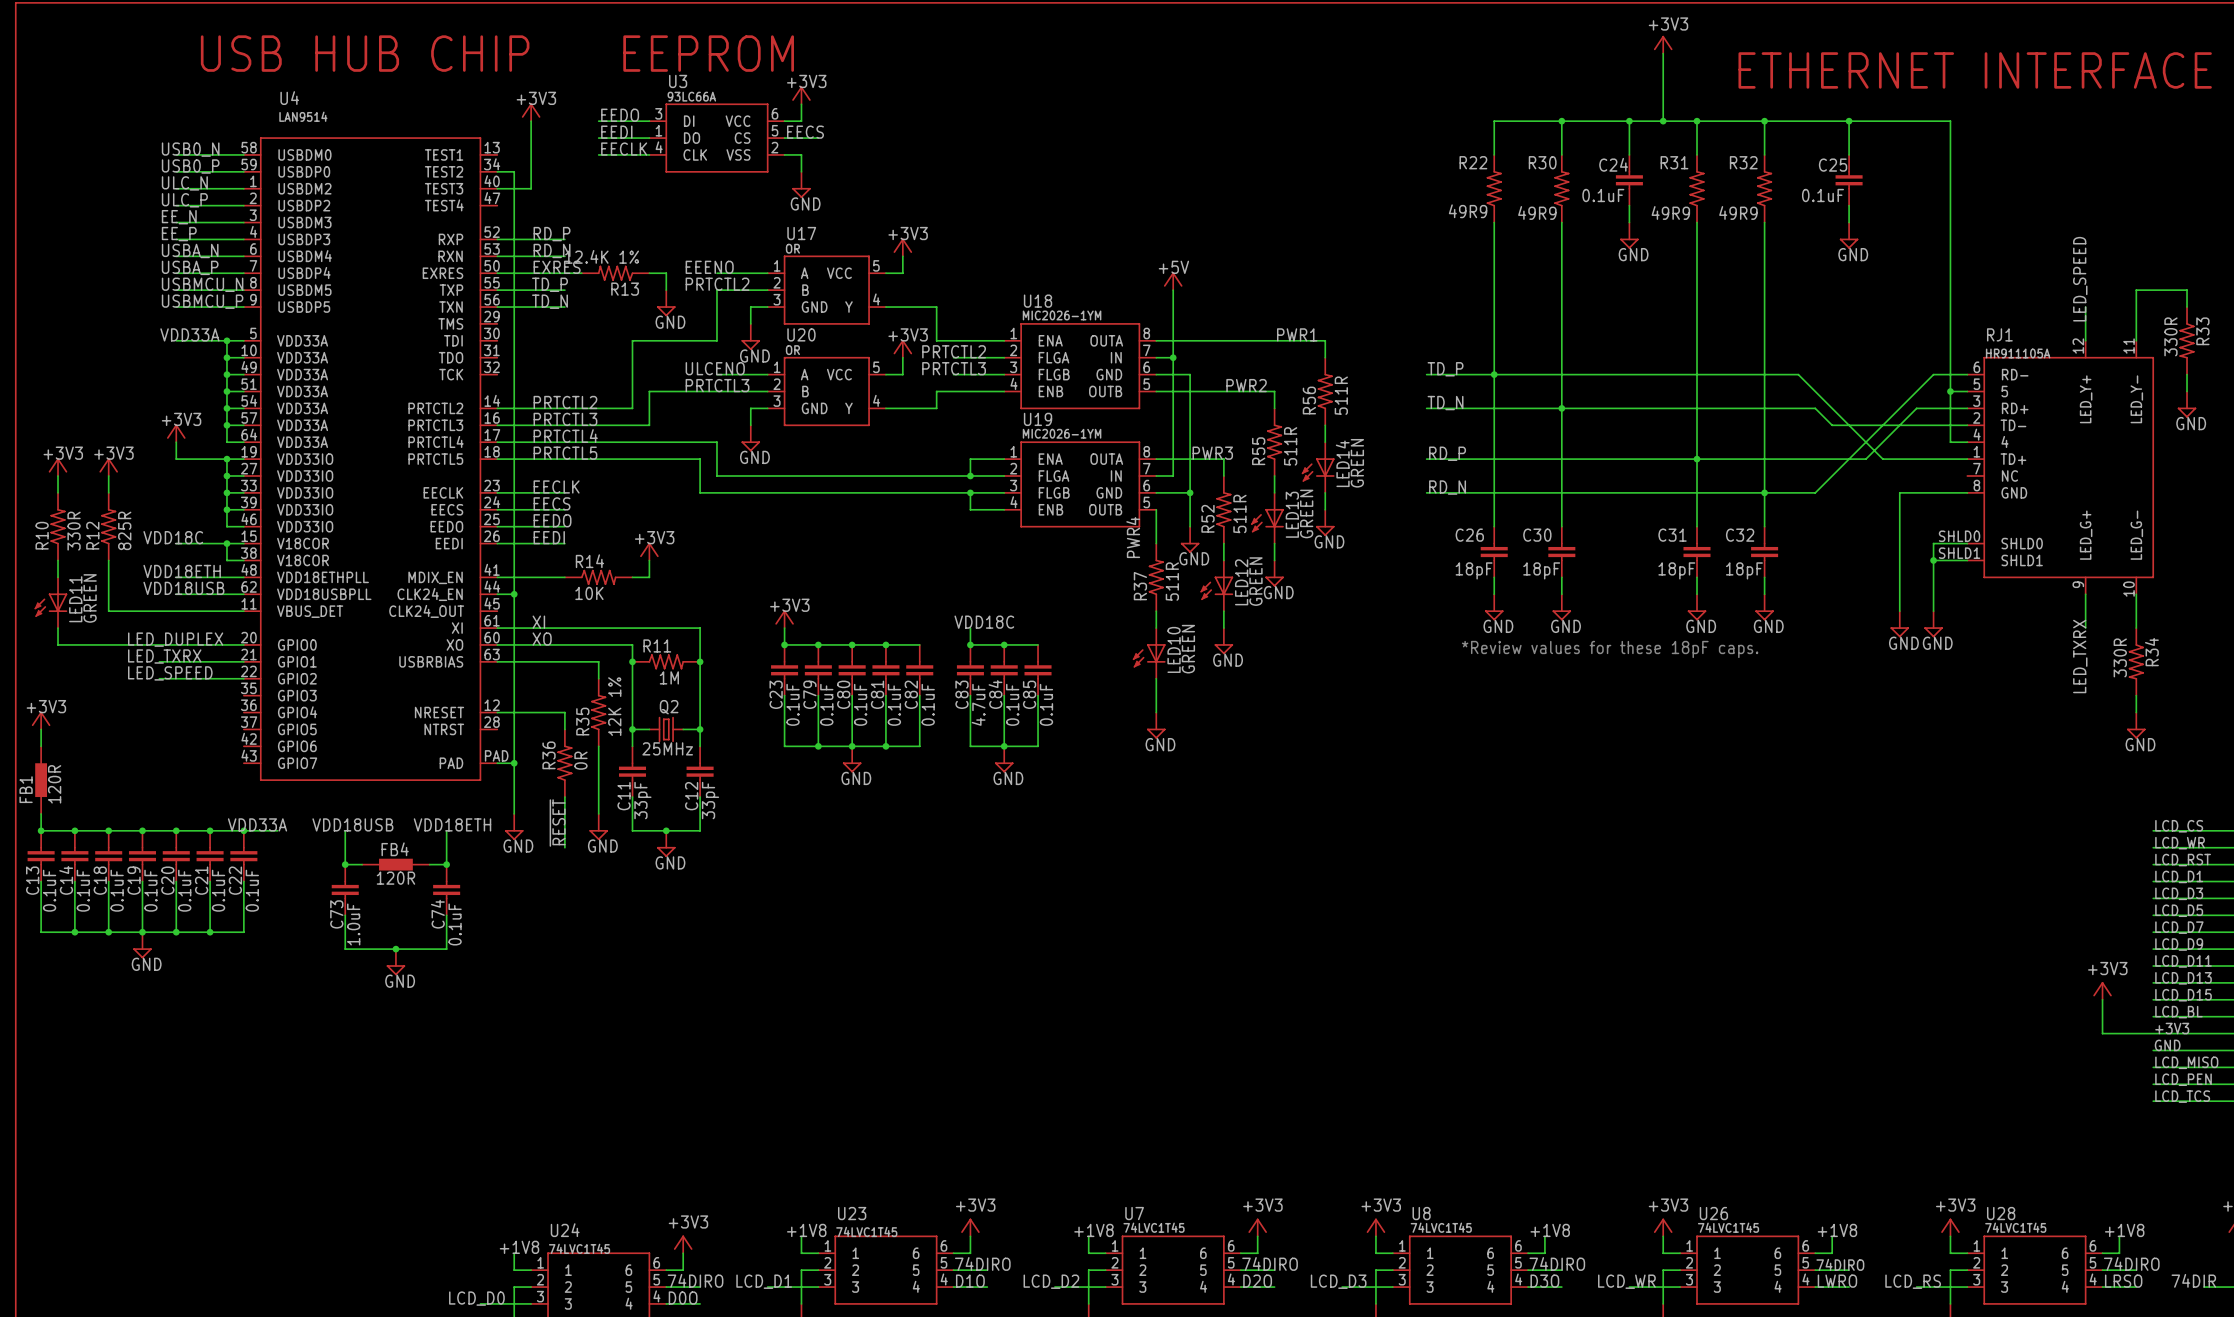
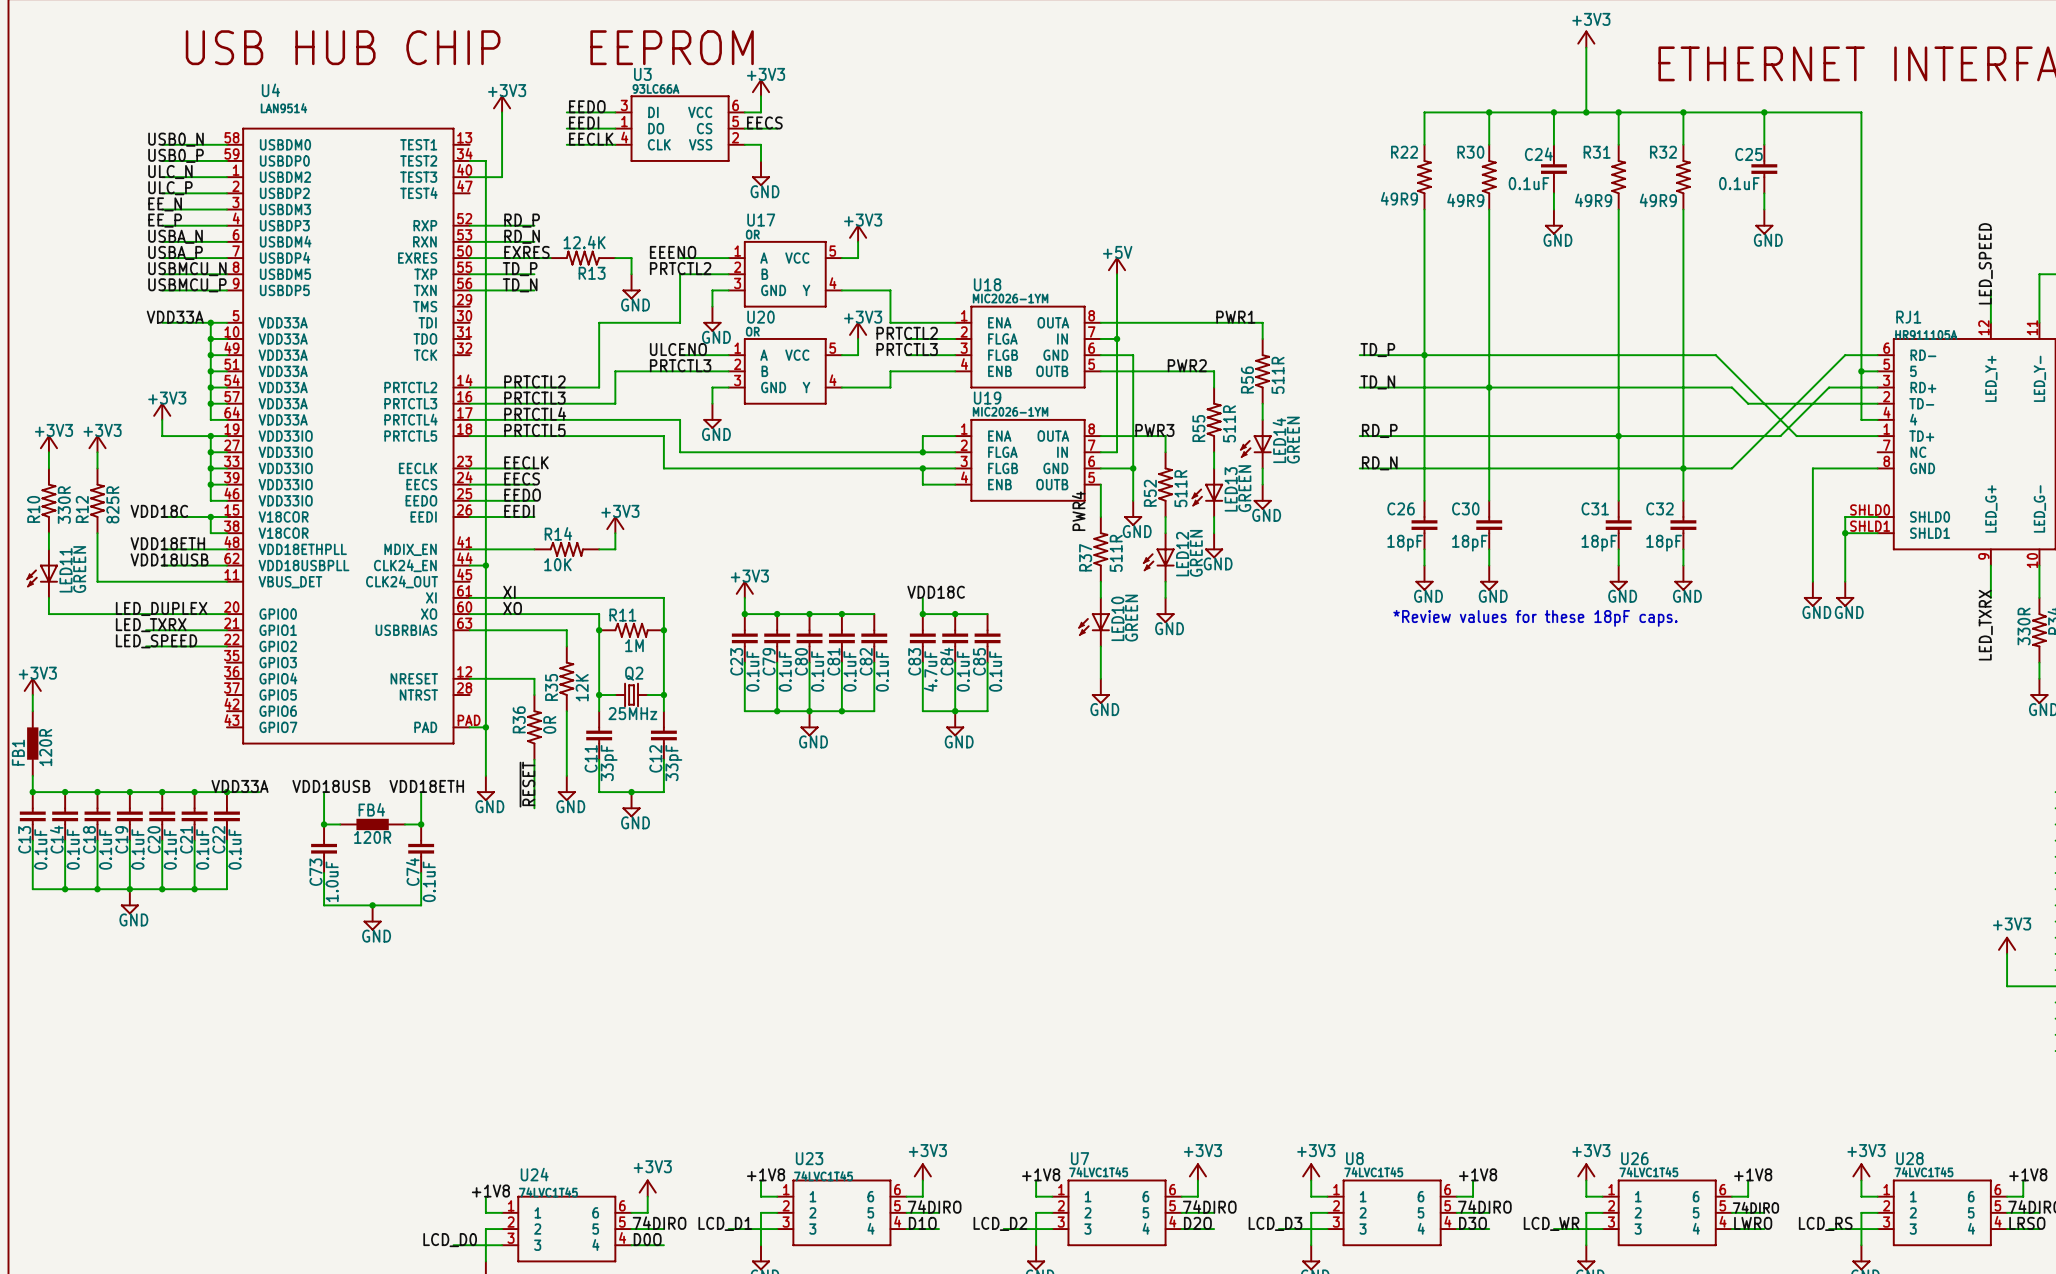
R13 value: 12.4K 1% (602, 256) -> 12.4K (584, 242)
R35 value: 12K 1% (614, 706) -> 12K (582, 687)

